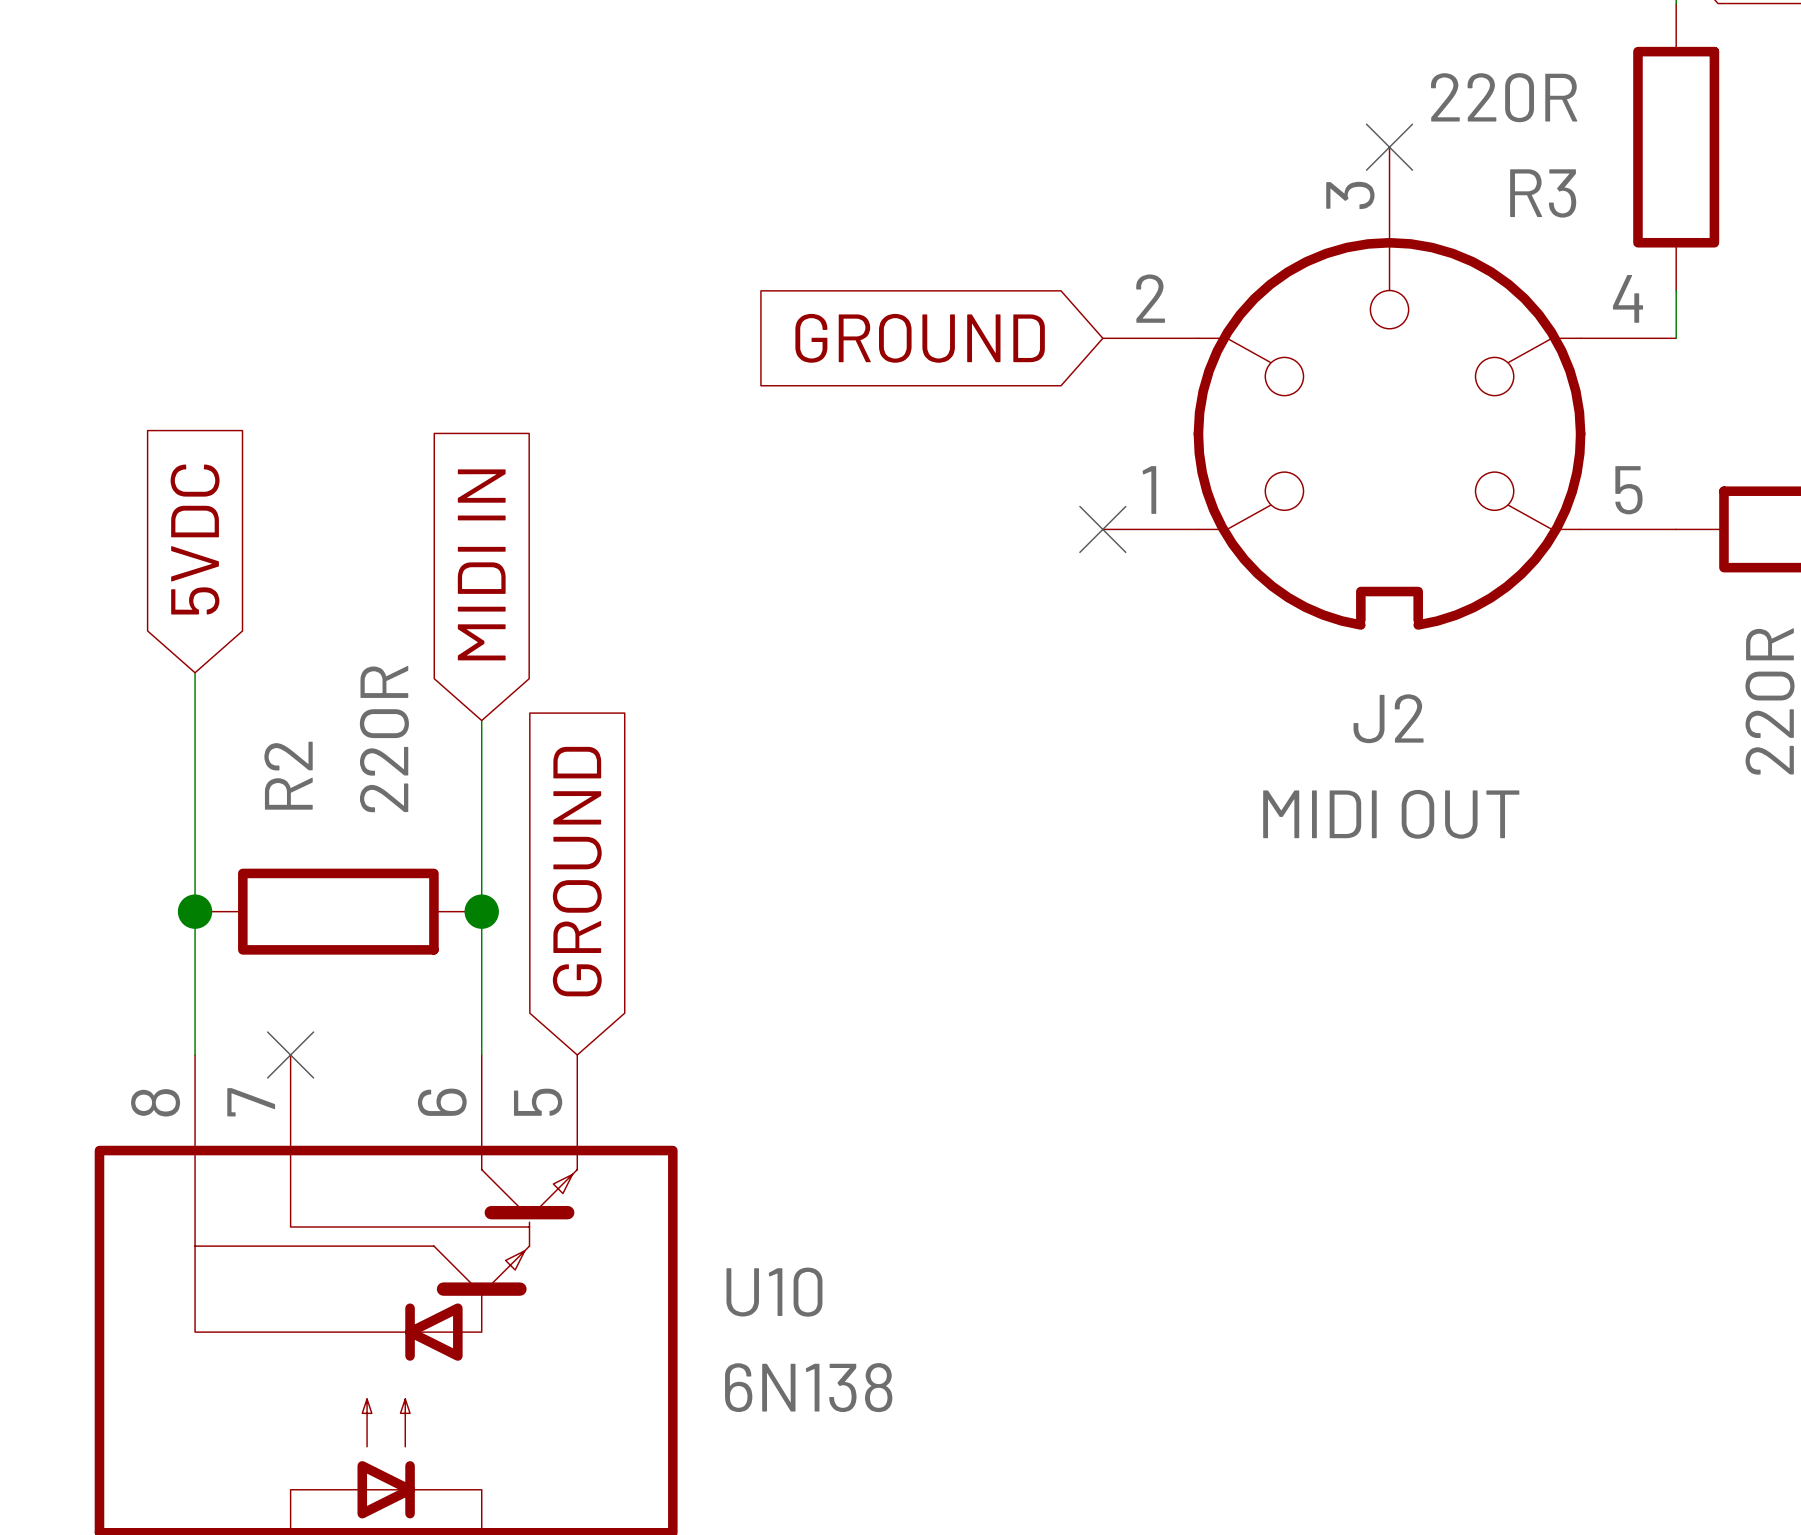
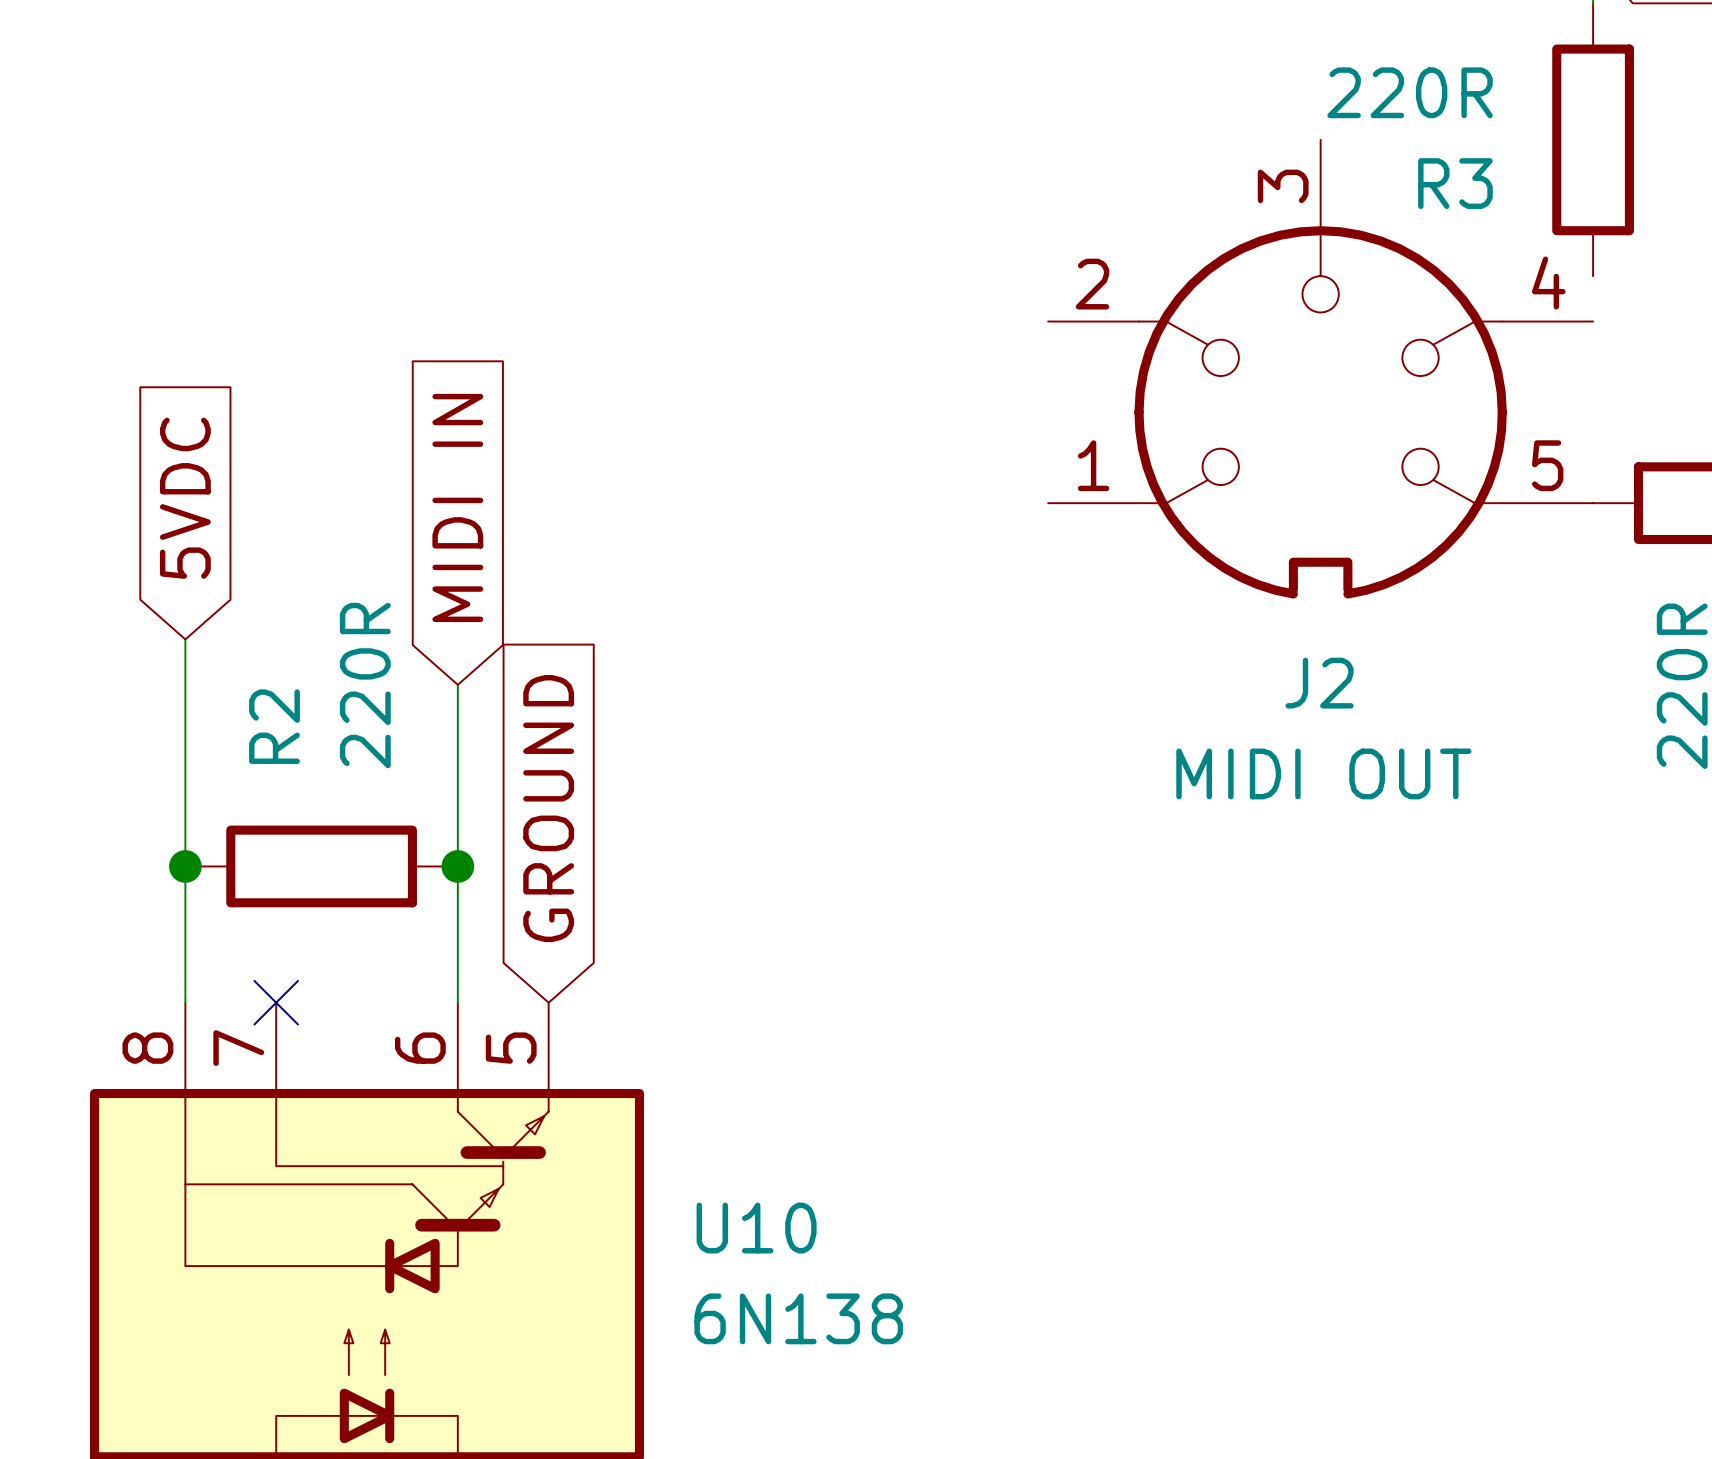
no-connect mark: (1389, 147) -> none
wire: (1676, 290) (1676, 338) -> none
global label: GROUND (920, 338) -> none
no-connect mark: (1102, 529) -> none

